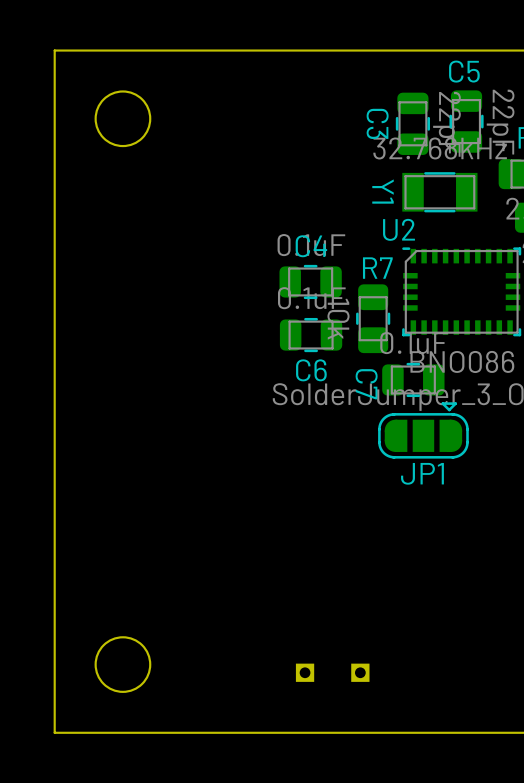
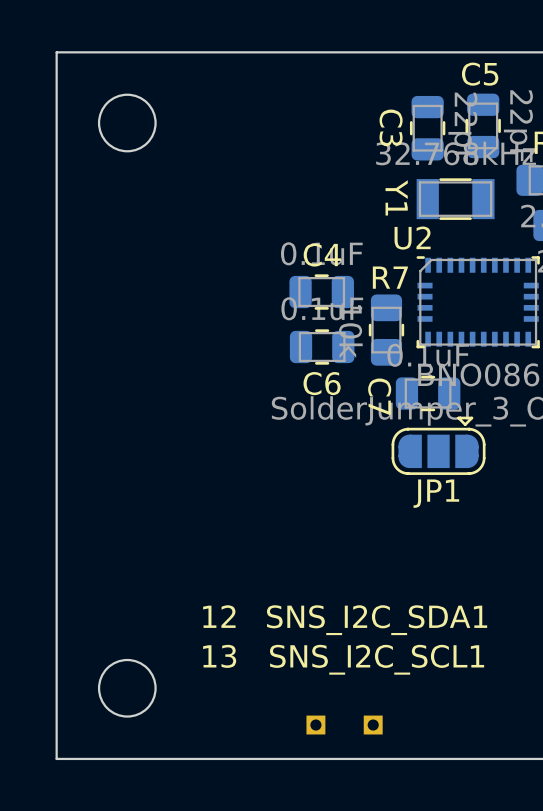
text: none -> 12 (219, 616)
text: none -> 13 (219, 656)
part: (305, 672) -> none
part: (360, 672) -> none
SNS_I2C_SCL1: none -> (315, 725)
SNS_I2C_SDA1: none -> (373, 725)

